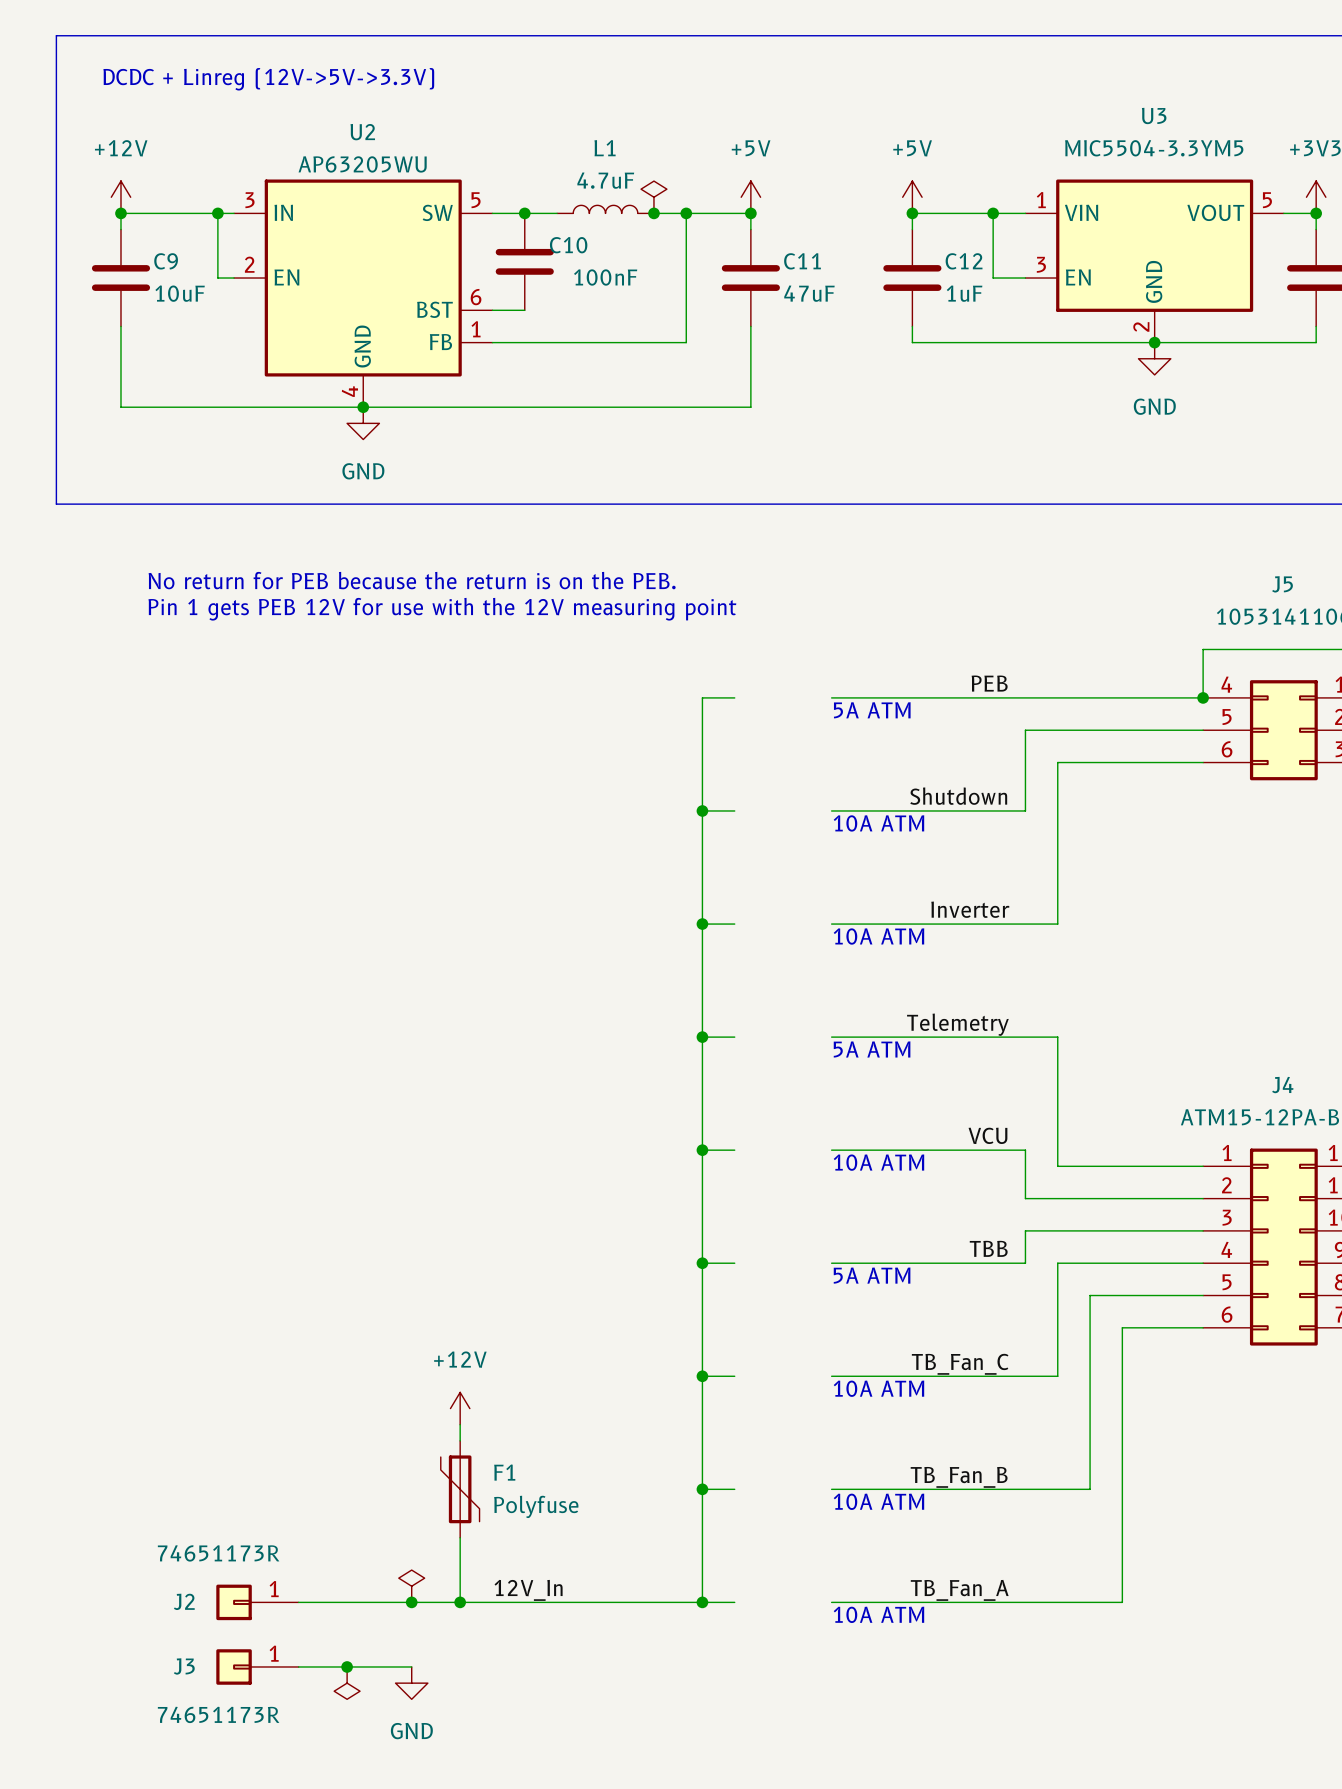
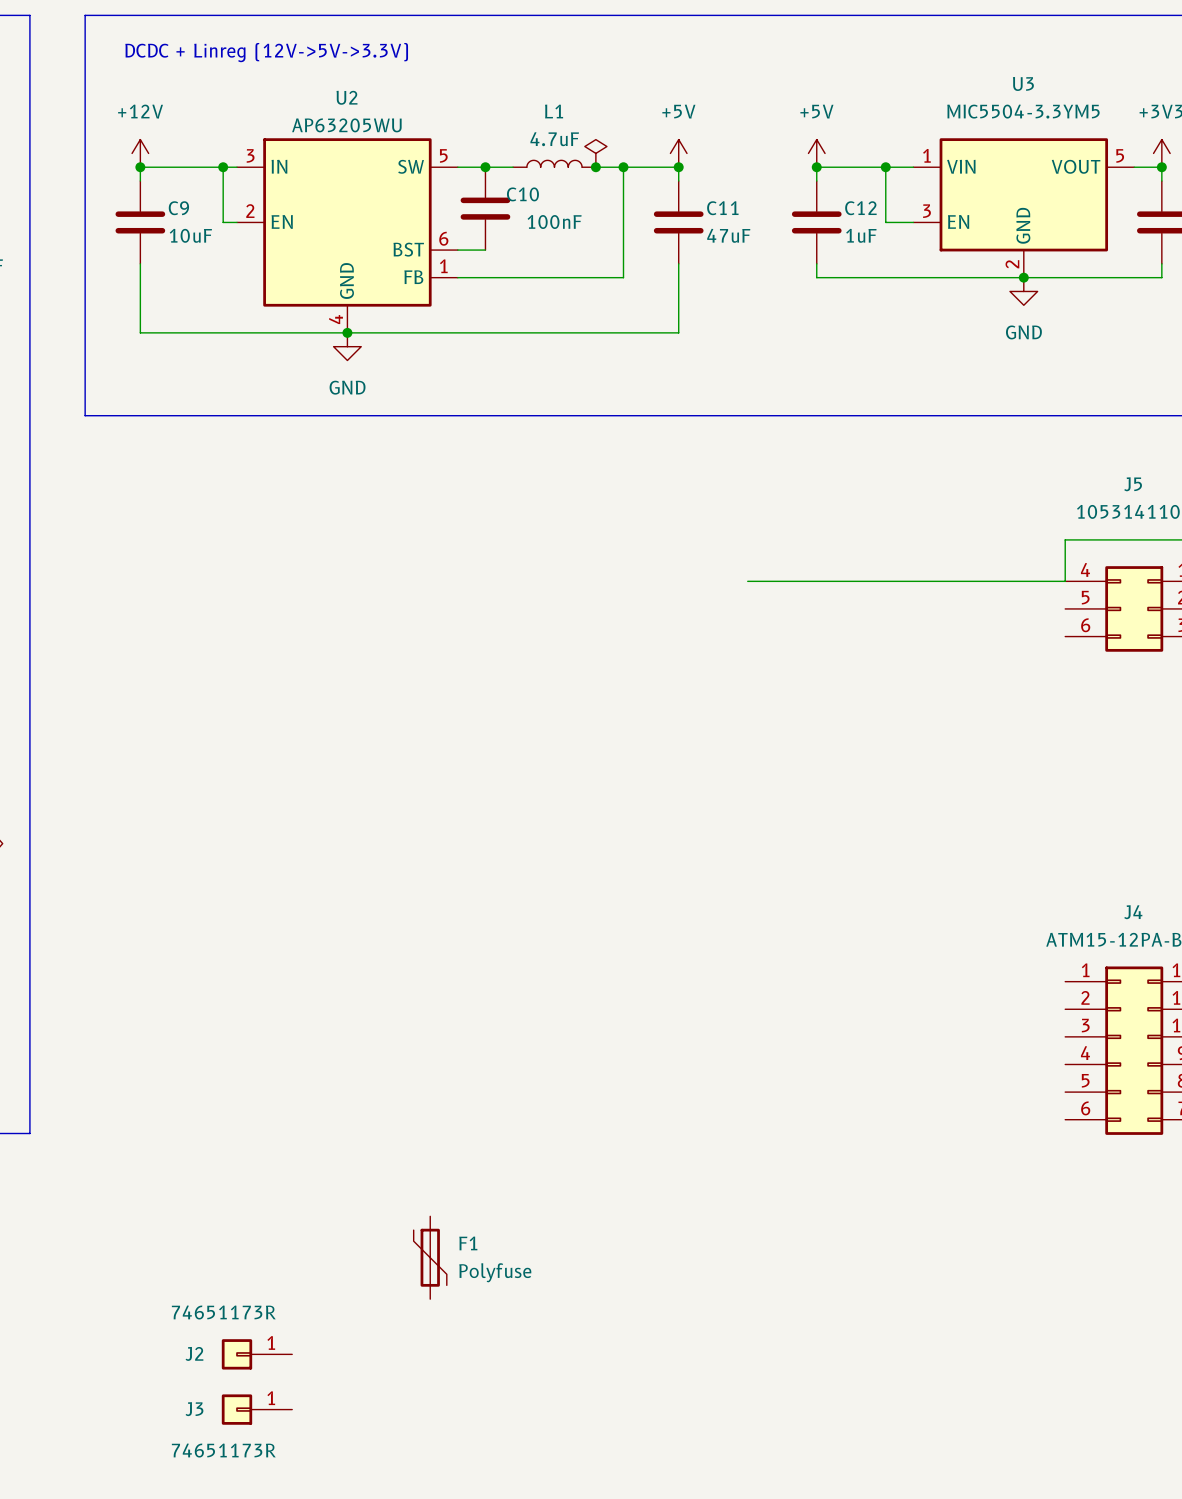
text: No return for PEB because the return is on the PEB. (412, 580) -> none
text: Pin 1 gets PEB 12V for use with the 12V measuring point (442, 609) -> none
label: PEB (989, 683) -> none
wire: (734, 697) (702, 697) (702, 1602) -> none
junction: (1203, 697) -> none
text: 5A ATM (872, 710) -> none
wire: (1203, 730) (1025, 730) (1025, 810) (831, 810) -> none
wire: (1203, 762) (1057, 762) (1057, 924) (831, 924) -> none
label: Shutdown (958, 796) -> none
wire: (702, 810) (734, 810) -> none
junction: (702, 810) -> none
text: 10A ATM (878, 823) -> none
label: Inverter (970, 909) -> none
wire: (702, 924) (734, 924) -> none
junction: (702, 924) -> none
text: 10A ATM (878, 936) -> none
label: Telemetry (957, 1024) -> none
wire: (702, 1037) (734, 1037) -> none
junction: (702, 1037) -> none
wire: (831, 1037) (1057, 1037) (1057, 1166) (1203, 1166) -> none
text: 5A ATM (872, 1049) -> none
label: VCU (987, 1135) -> none
wire: (702, 1150) (734, 1150) -> none
junction: (702, 1150) -> none
wire: (831, 1150) (1025, 1150) (1025, 1198) (1203, 1198) -> none
text: 10A ATM (878, 1162) -> none
wire: (1203, 1230) (1025, 1230) (1025, 1263) (831, 1263) -> none
label: TBB (988, 1248) -> none
wire: (702, 1263) (734, 1263) -> none
junction: (702, 1263) -> none
wire: (1203, 1263) (1057, 1263) (1057, 1376) (831, 1376) -> none
text: 5A ATM (872, 1275) -> none
wire: (1203, 1295) (1090, 1295) (1090, 1489) (831, 1489) -> none
wire: (1203, 1327) (1122, 1327) (1122, 1602) (831, 1602) -> none
label: TB_Fan_C (960, 1364) -> none
wire: (702, 1376) (734, 1376) -> none
junction: (702, 1376) -> none
text: 10A ATM (878, 1388) -> none
power symbol: +12V (460, 1408) -> none
wire: (460, 1424) (460, 1440) -> none
label: TB_Fan_B (959, 1477) -> none
wire: (702, 1489) (734, 1489) -> none
junction: (702, 1489) -> none
text: 10A ATM (878, 1501) -> none
wire: (460, 1537) (460, 1602) -> none
power symbol: (411, 1586) -> none
label: 12V_In (528, 1590) -> none
label: TB_Fan_A (959, 1590) -> none
wire: (298, 1602) (734, 1602) -> none
junction: (411, 1602) -> none
junction: (460, 1602) -> none
junction: (702, 1602) -> none
text: 10A ATM (878, 1614) -> none
wire: (298, 1666) (411, 1666) -> none
junction: (347, 1666) -> none
power symbol: (347, 1683) -> none
power symbol: GND (411, 1683) -> none

